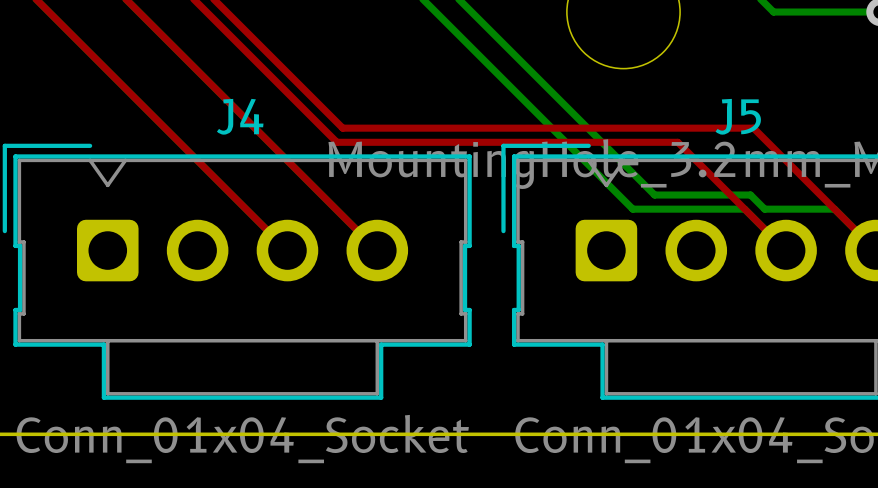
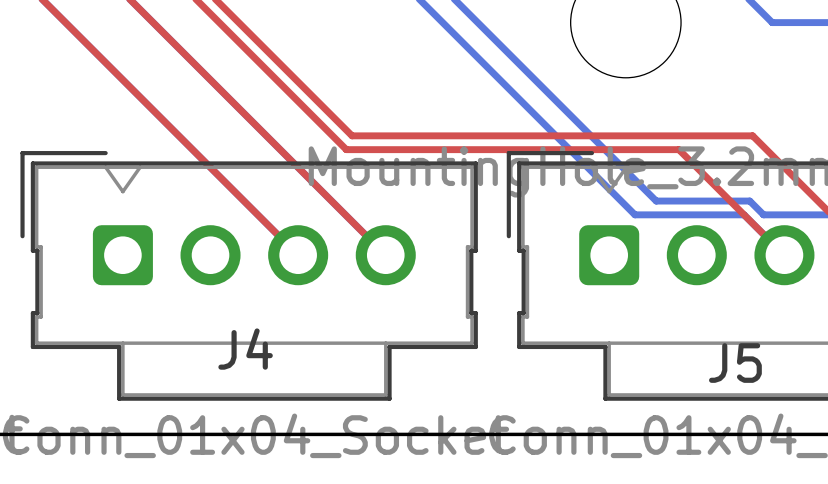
J4 name position: J4 (240, 116) -> J4 (245, 349)
J5 name position: J5 (738, 116) -> J5 (735, 363)

